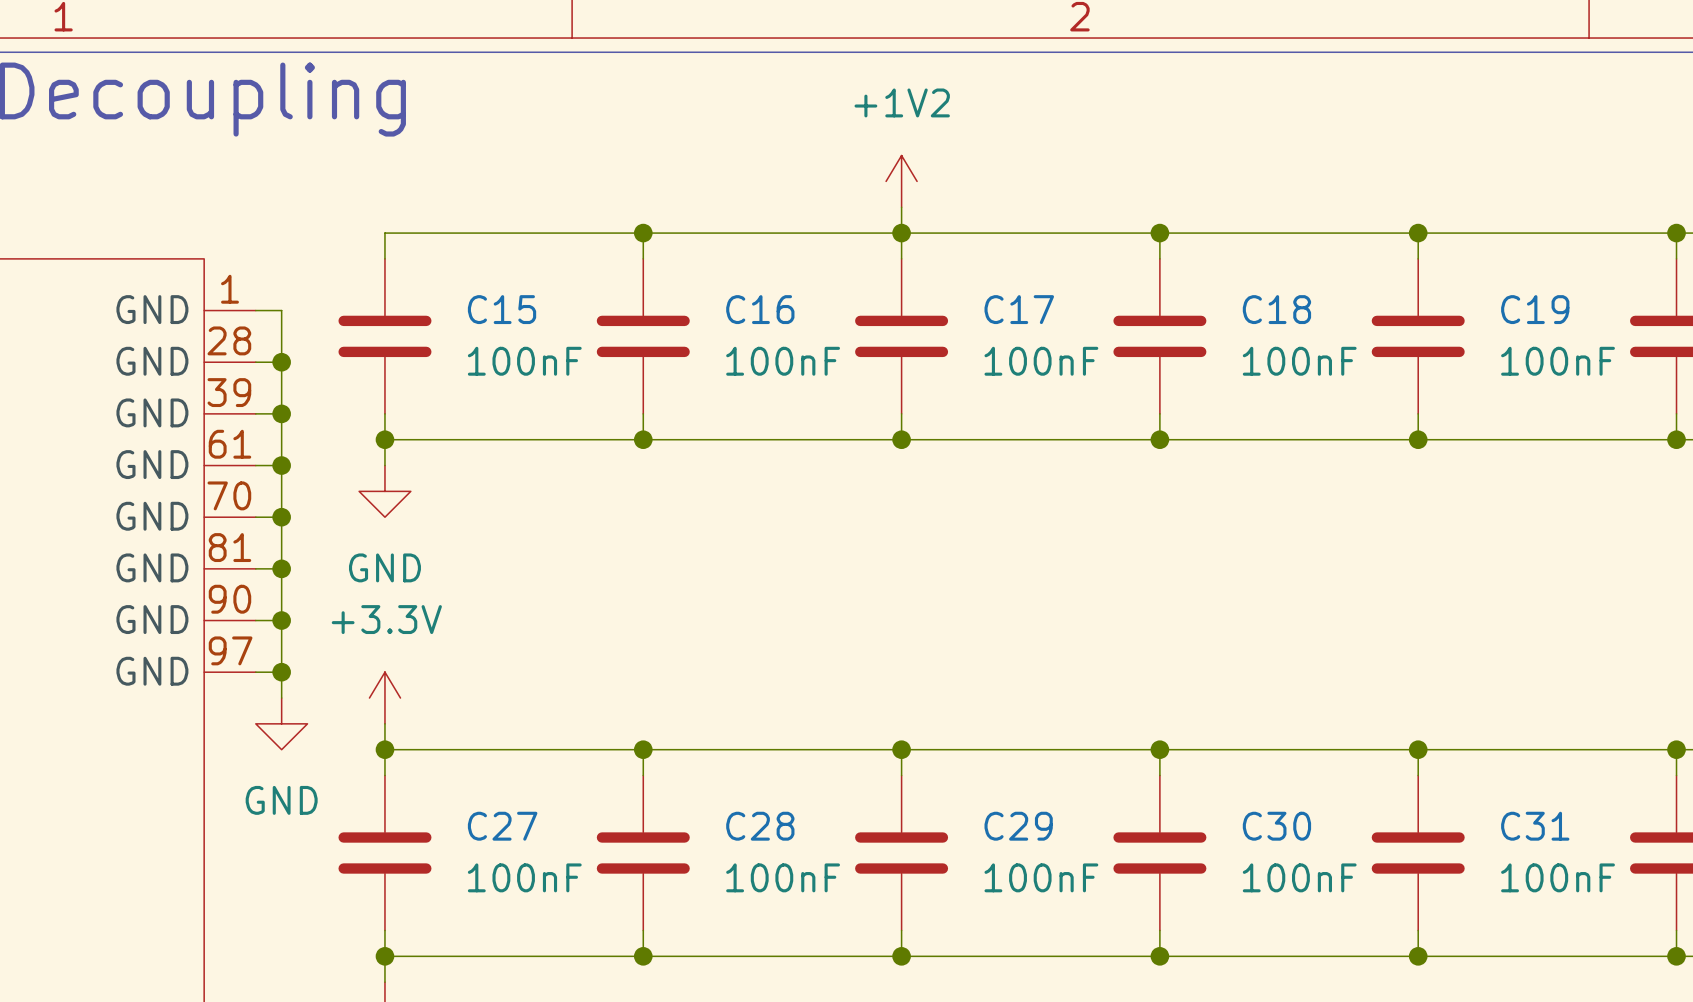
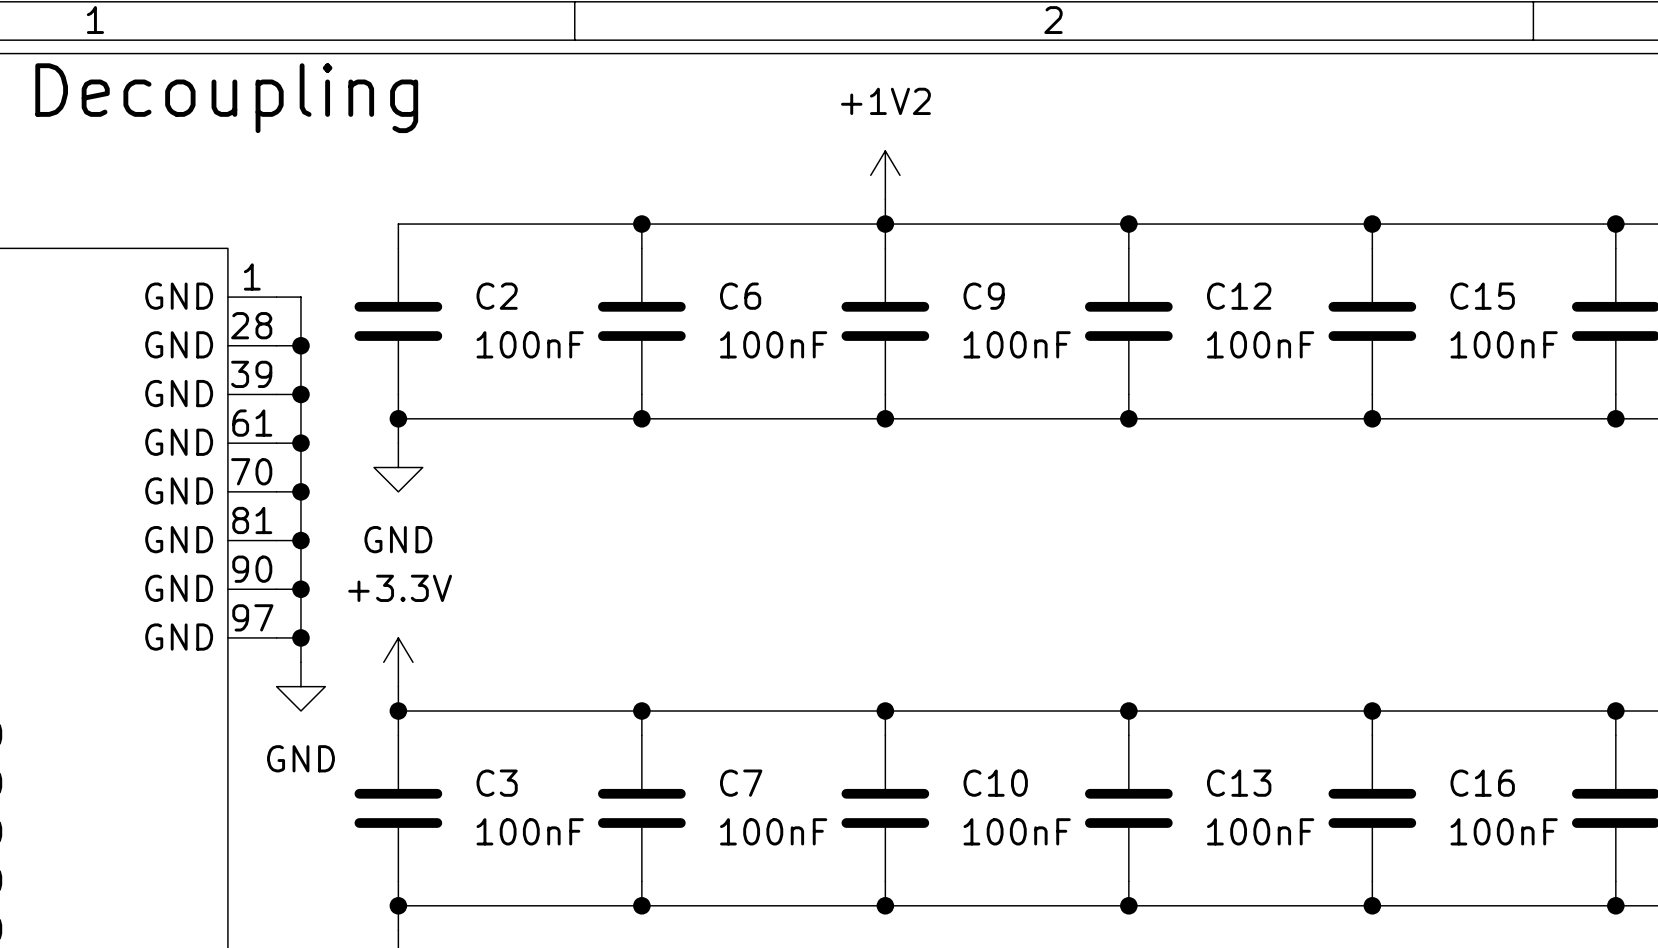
C15 name: C15 (502, 309) -> C2 (497, 296)
C16 name: C16 (760, 309) -> C6 (740, 296)
C17 name: C17 (1019, 309) -> C9 (984, 296)
C18 name: C18 (1276, 309) -> C12 (1239, 296)
C19 name: C19 (1535, 309) -> C15 (1482, 296)
C27 name: C27 (502, 826) -> C3 (497, 783)
C28 name: C28 (760, 826) -> C7 (741, 783)
C29 name: C29 (1018, 826) -> C10 (995, 783)
C30 name: C30 (1276, 826) -> C13 (1239, 783)
C31 name: C31 (1535, 826) -> C16 (1482, 783)

